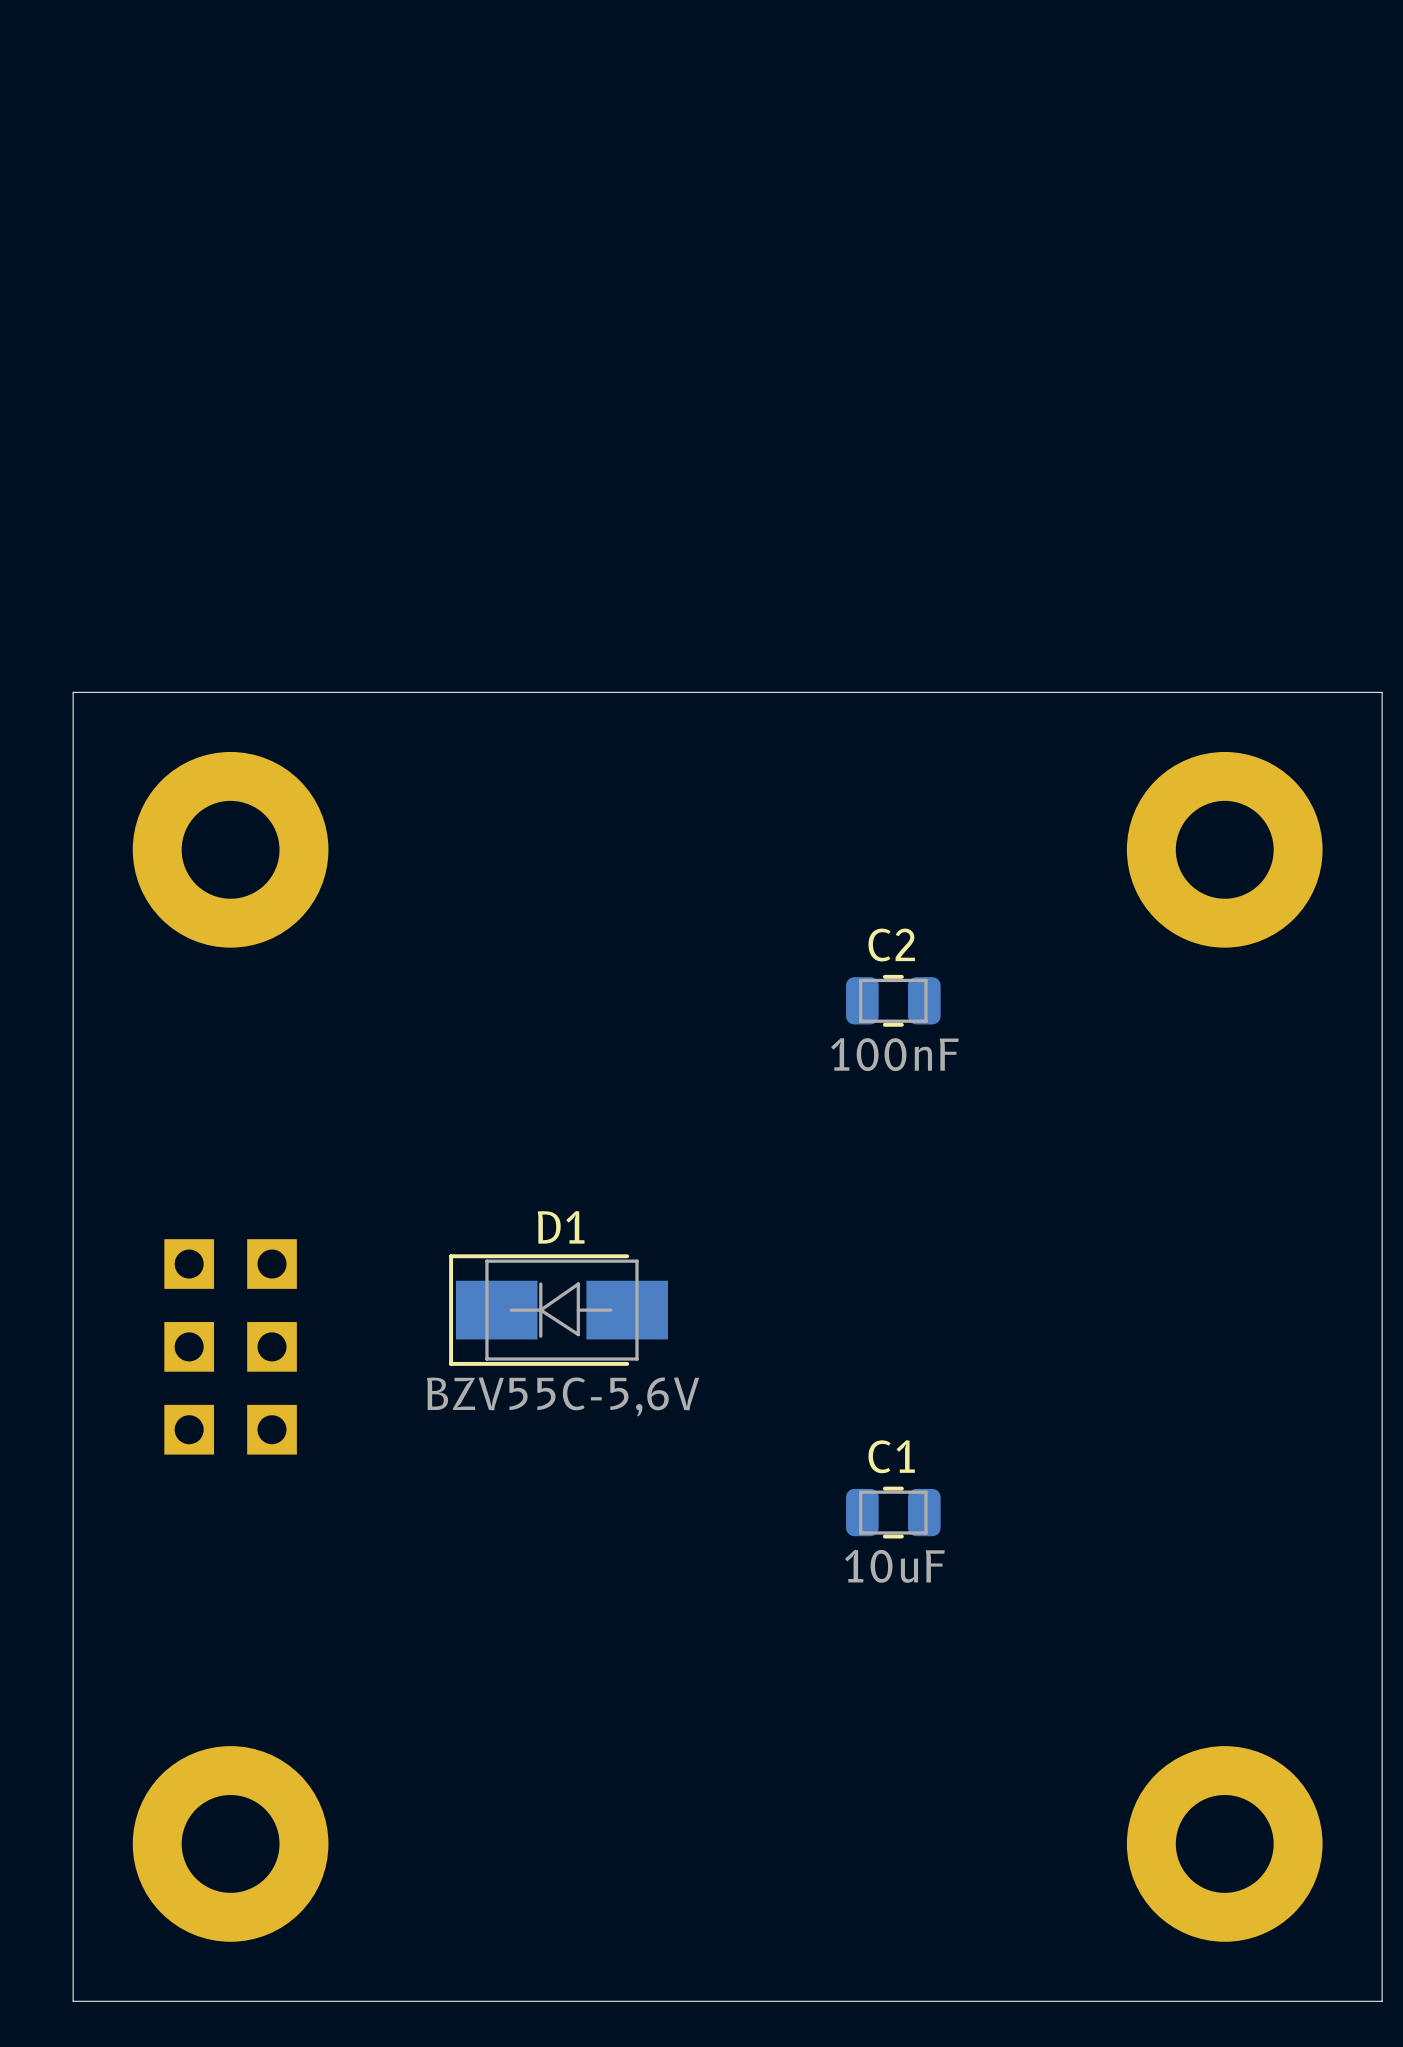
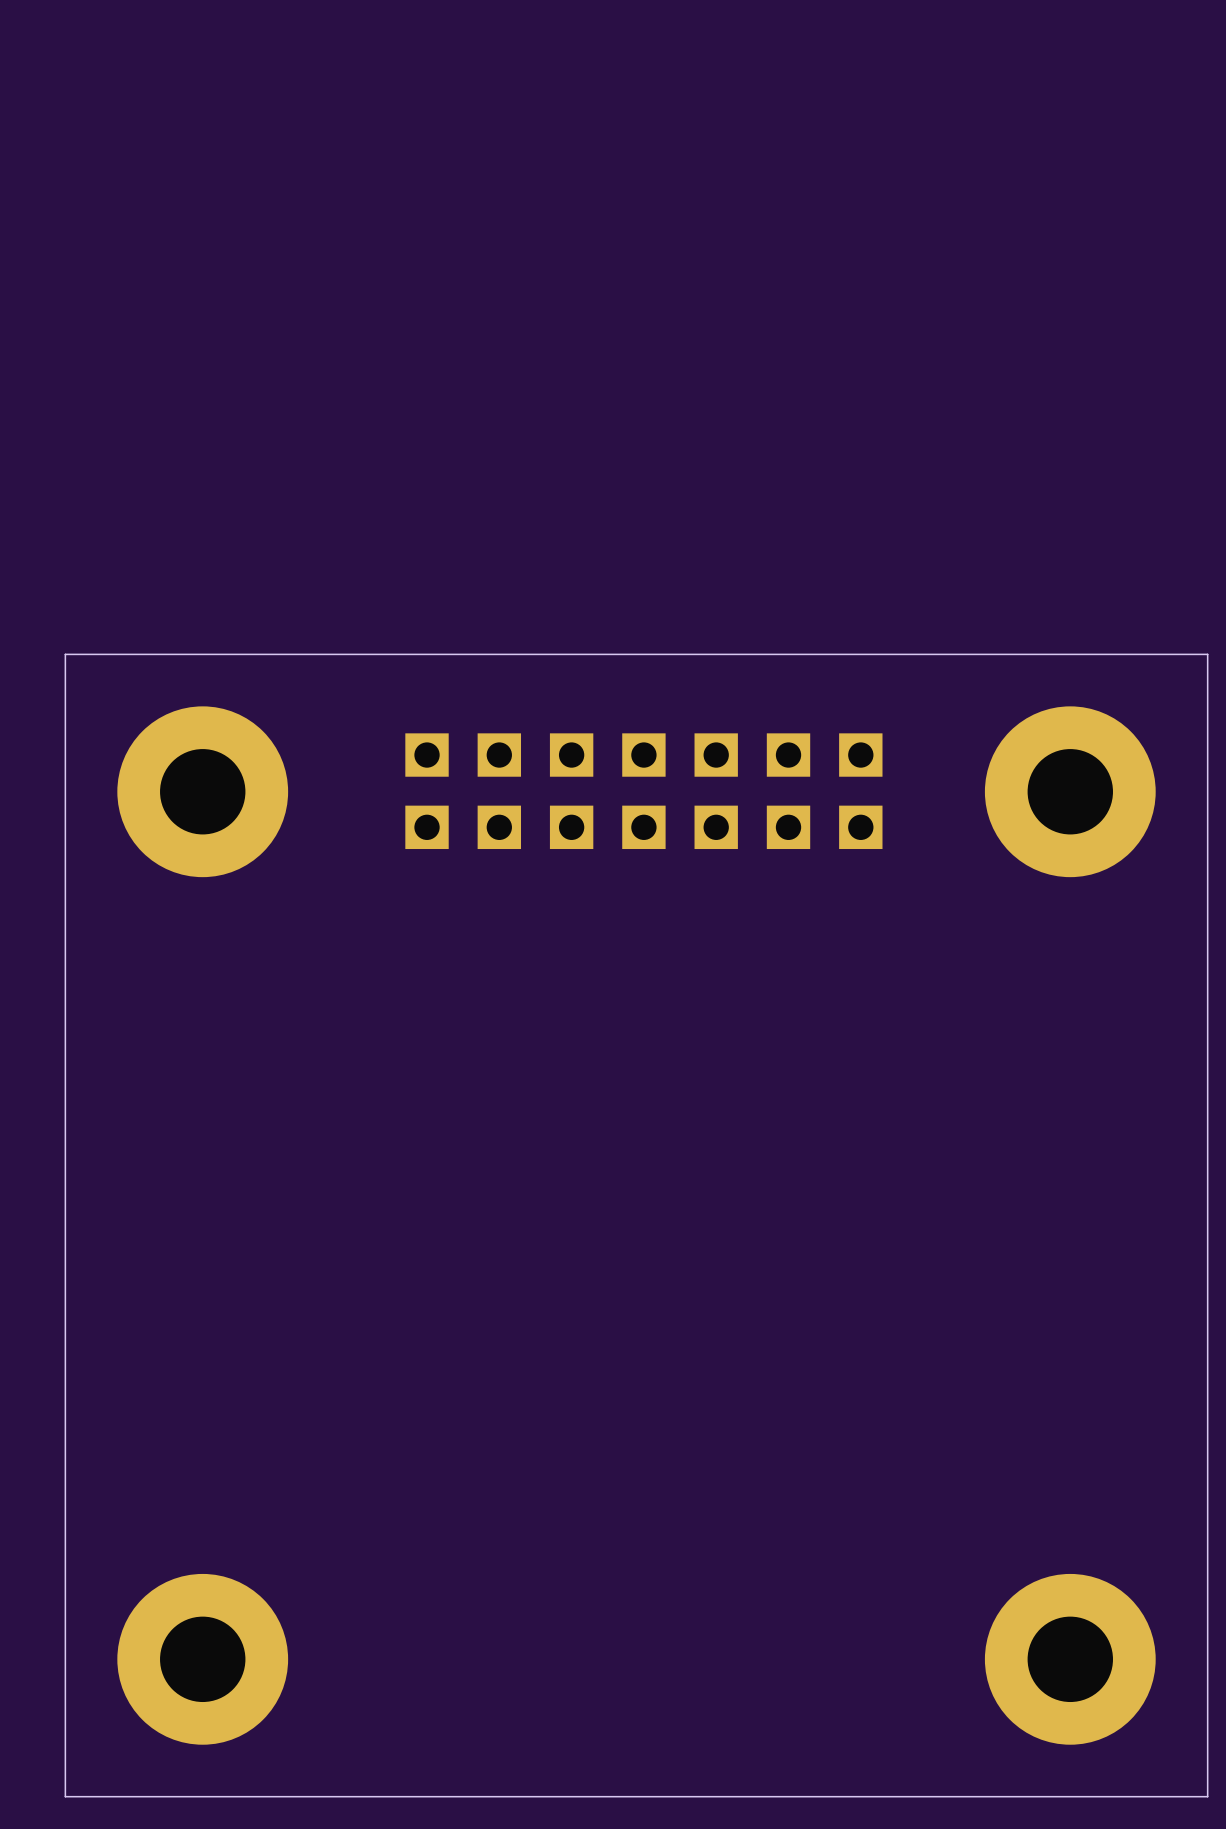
part: none -> (643, 791)
C2: 100nF (893, 1000) -> none
D1: BZV55C-5,6V (558, 1310) -> none
part: (230, 1346) -> none
C1: 10uF (893, 1512) -> none

